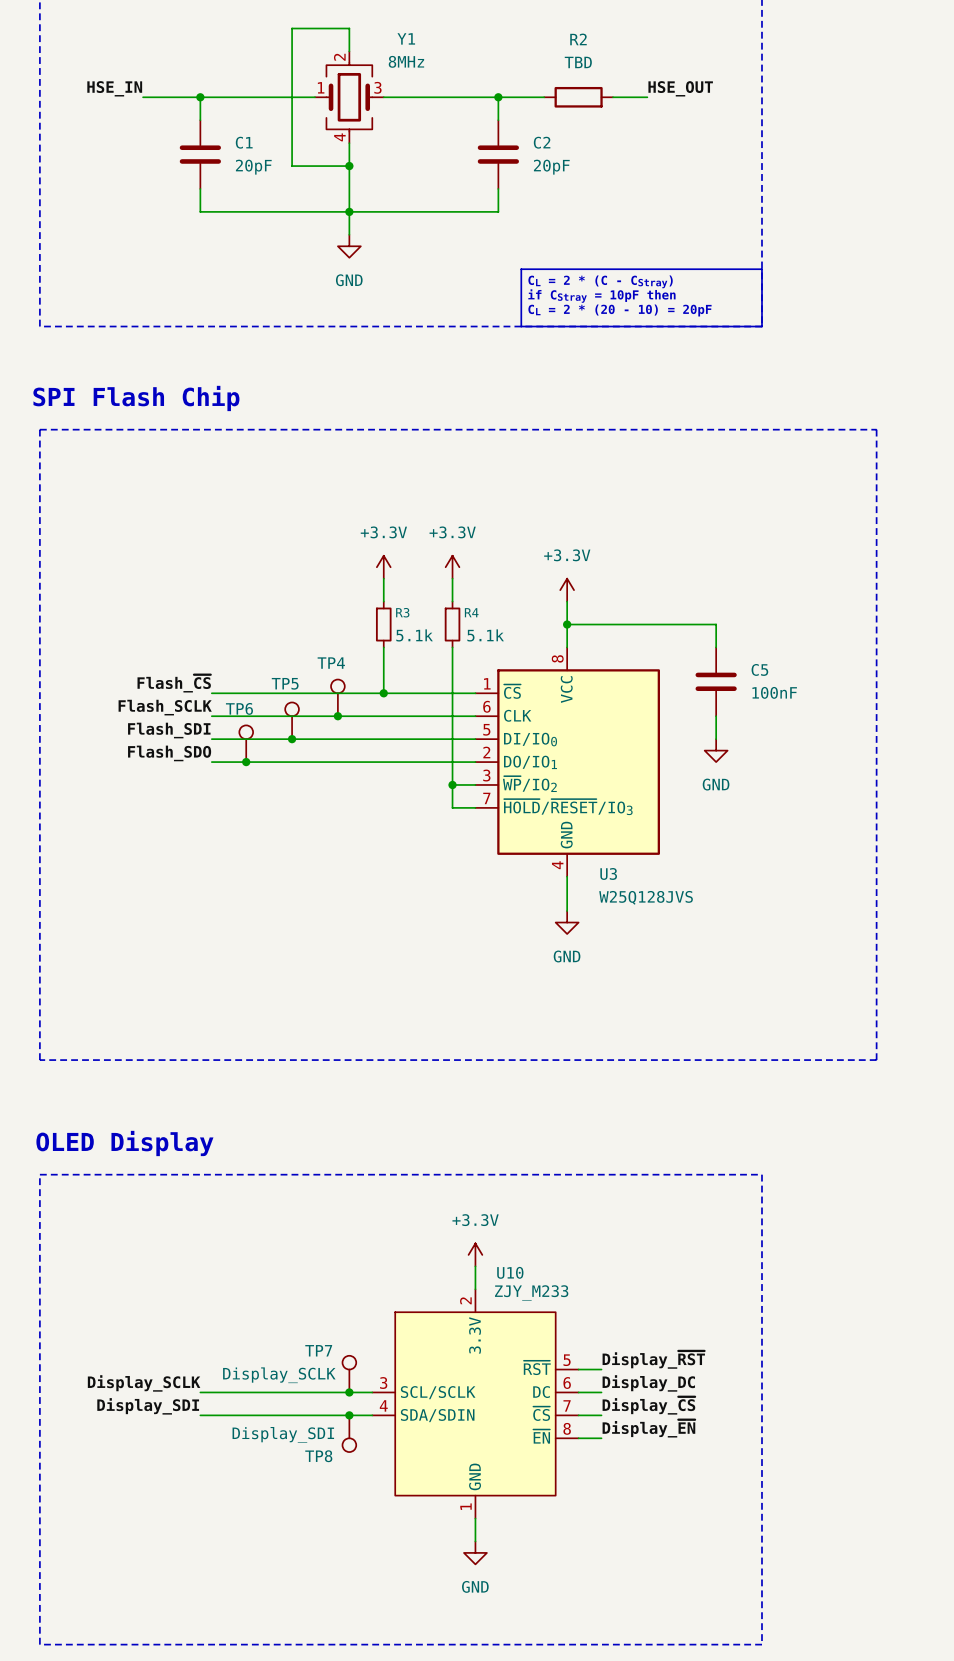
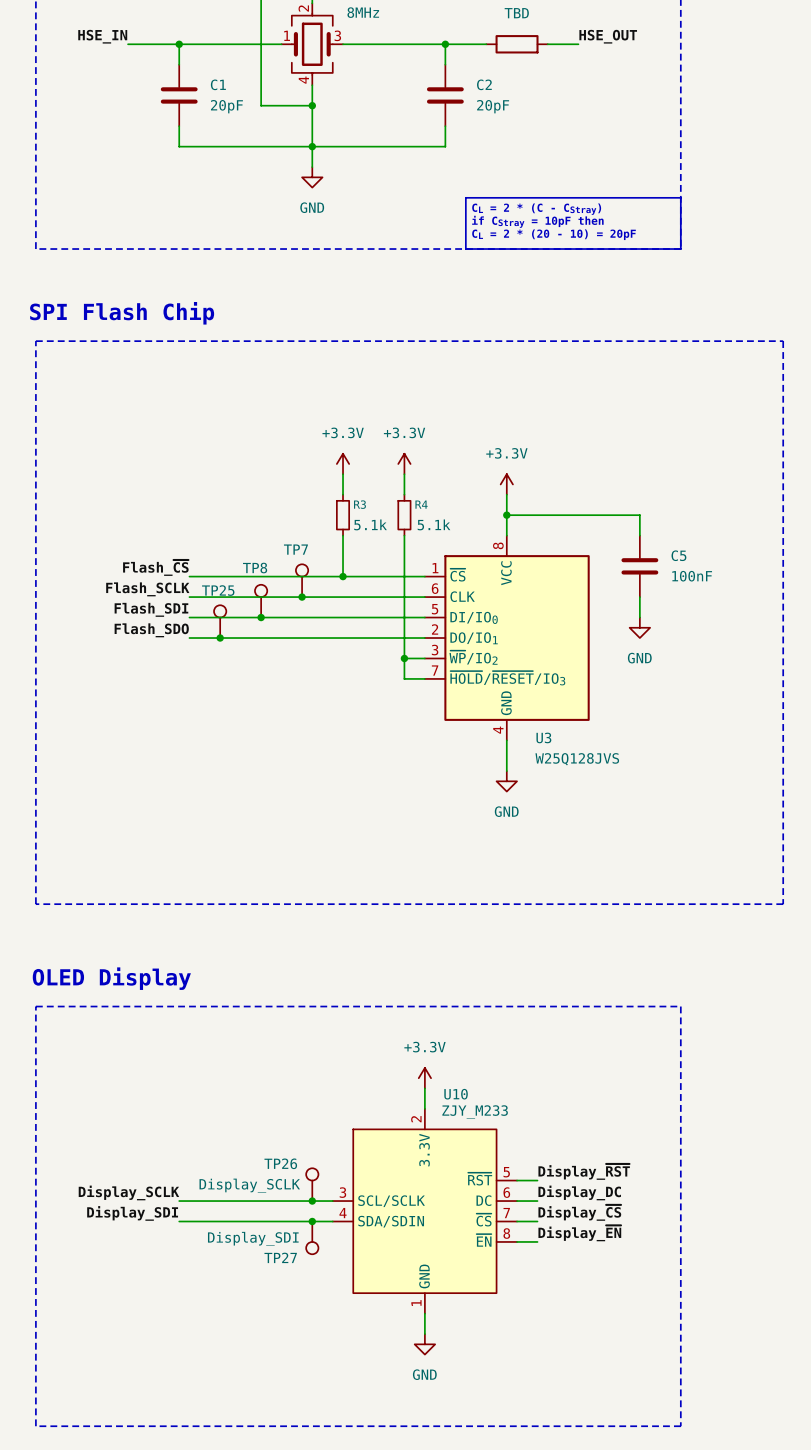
TP4 name: TP4 (331, 663) -> TP7 (295, 549)
TP5 name: TP5 (285, 683) -> TP8 (255, 568)
TP6 name: TP6 (239, 708) -> TP25 (218, 590)
TP7 name: TP7 (318, 1350) -> TP26 (280, 1163)
TP8 name: TP8 (318, 1456) -> TP27 (280, 1257)

